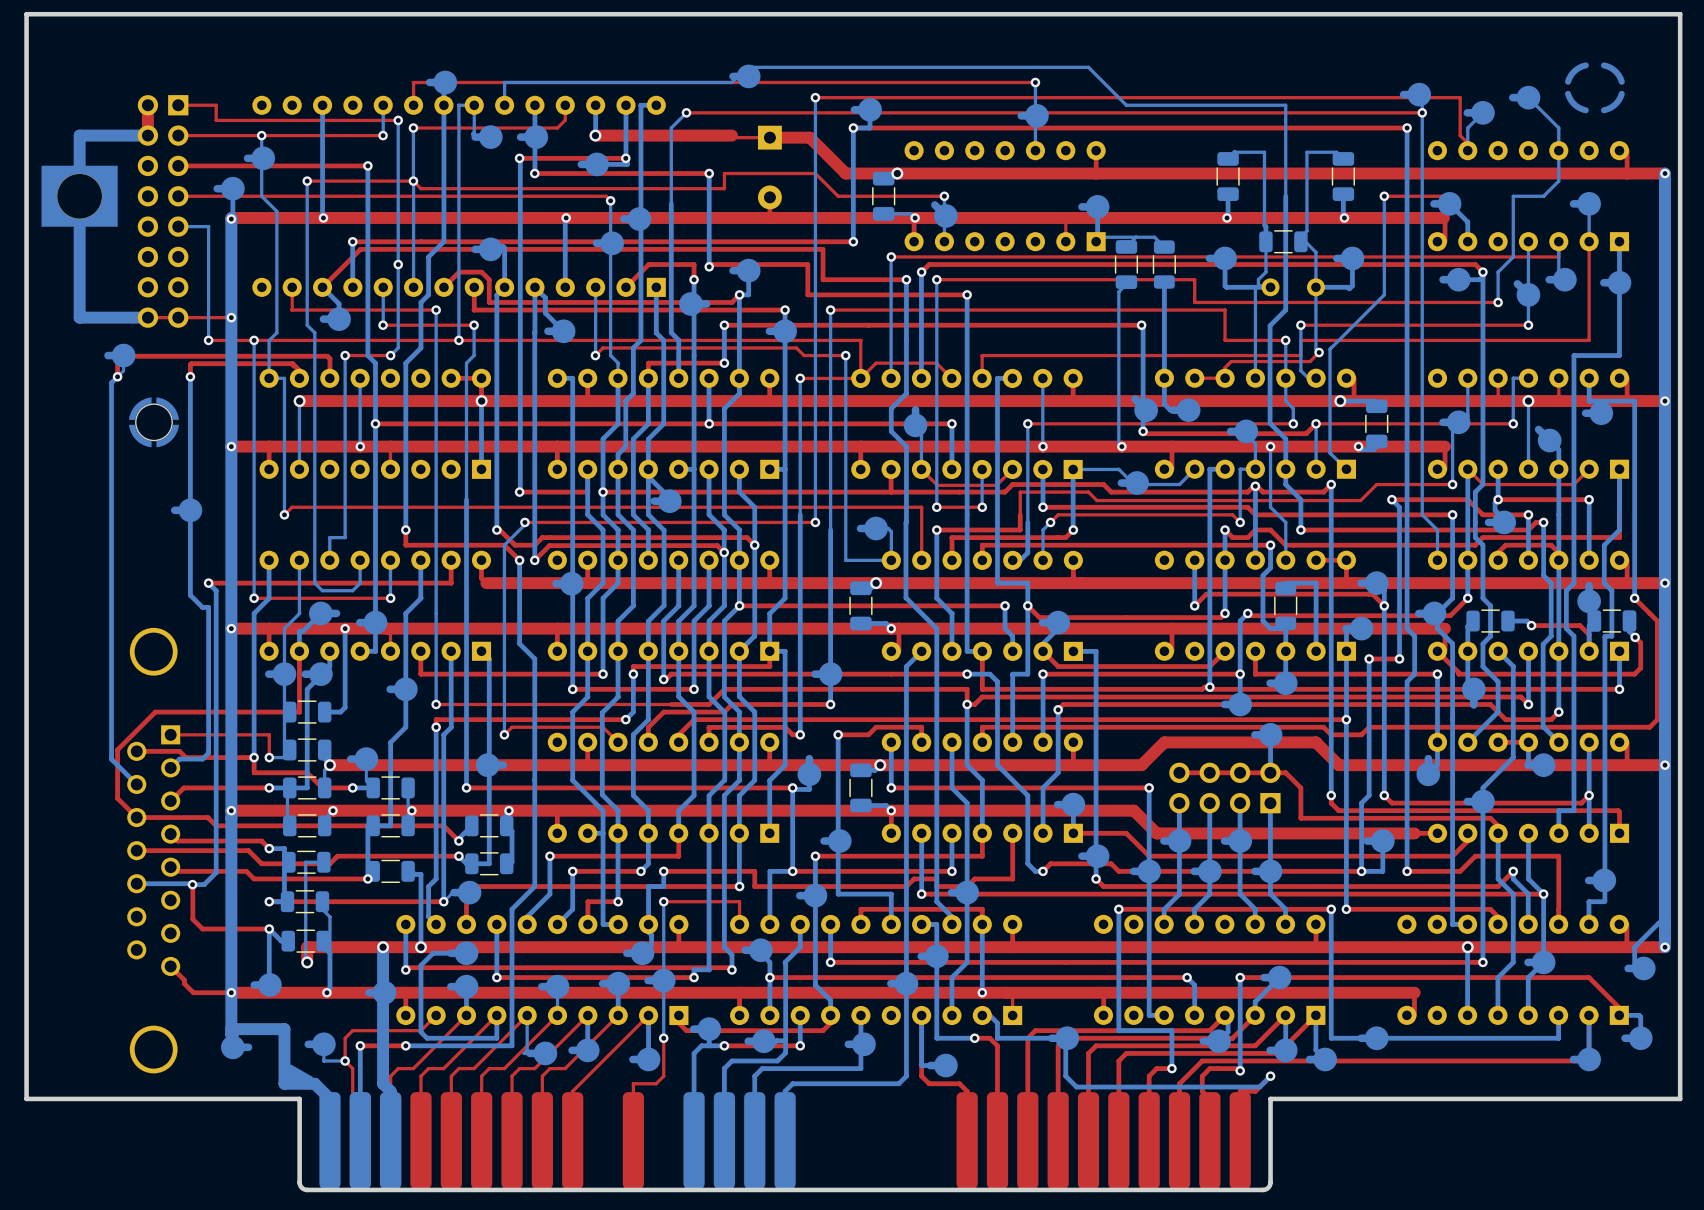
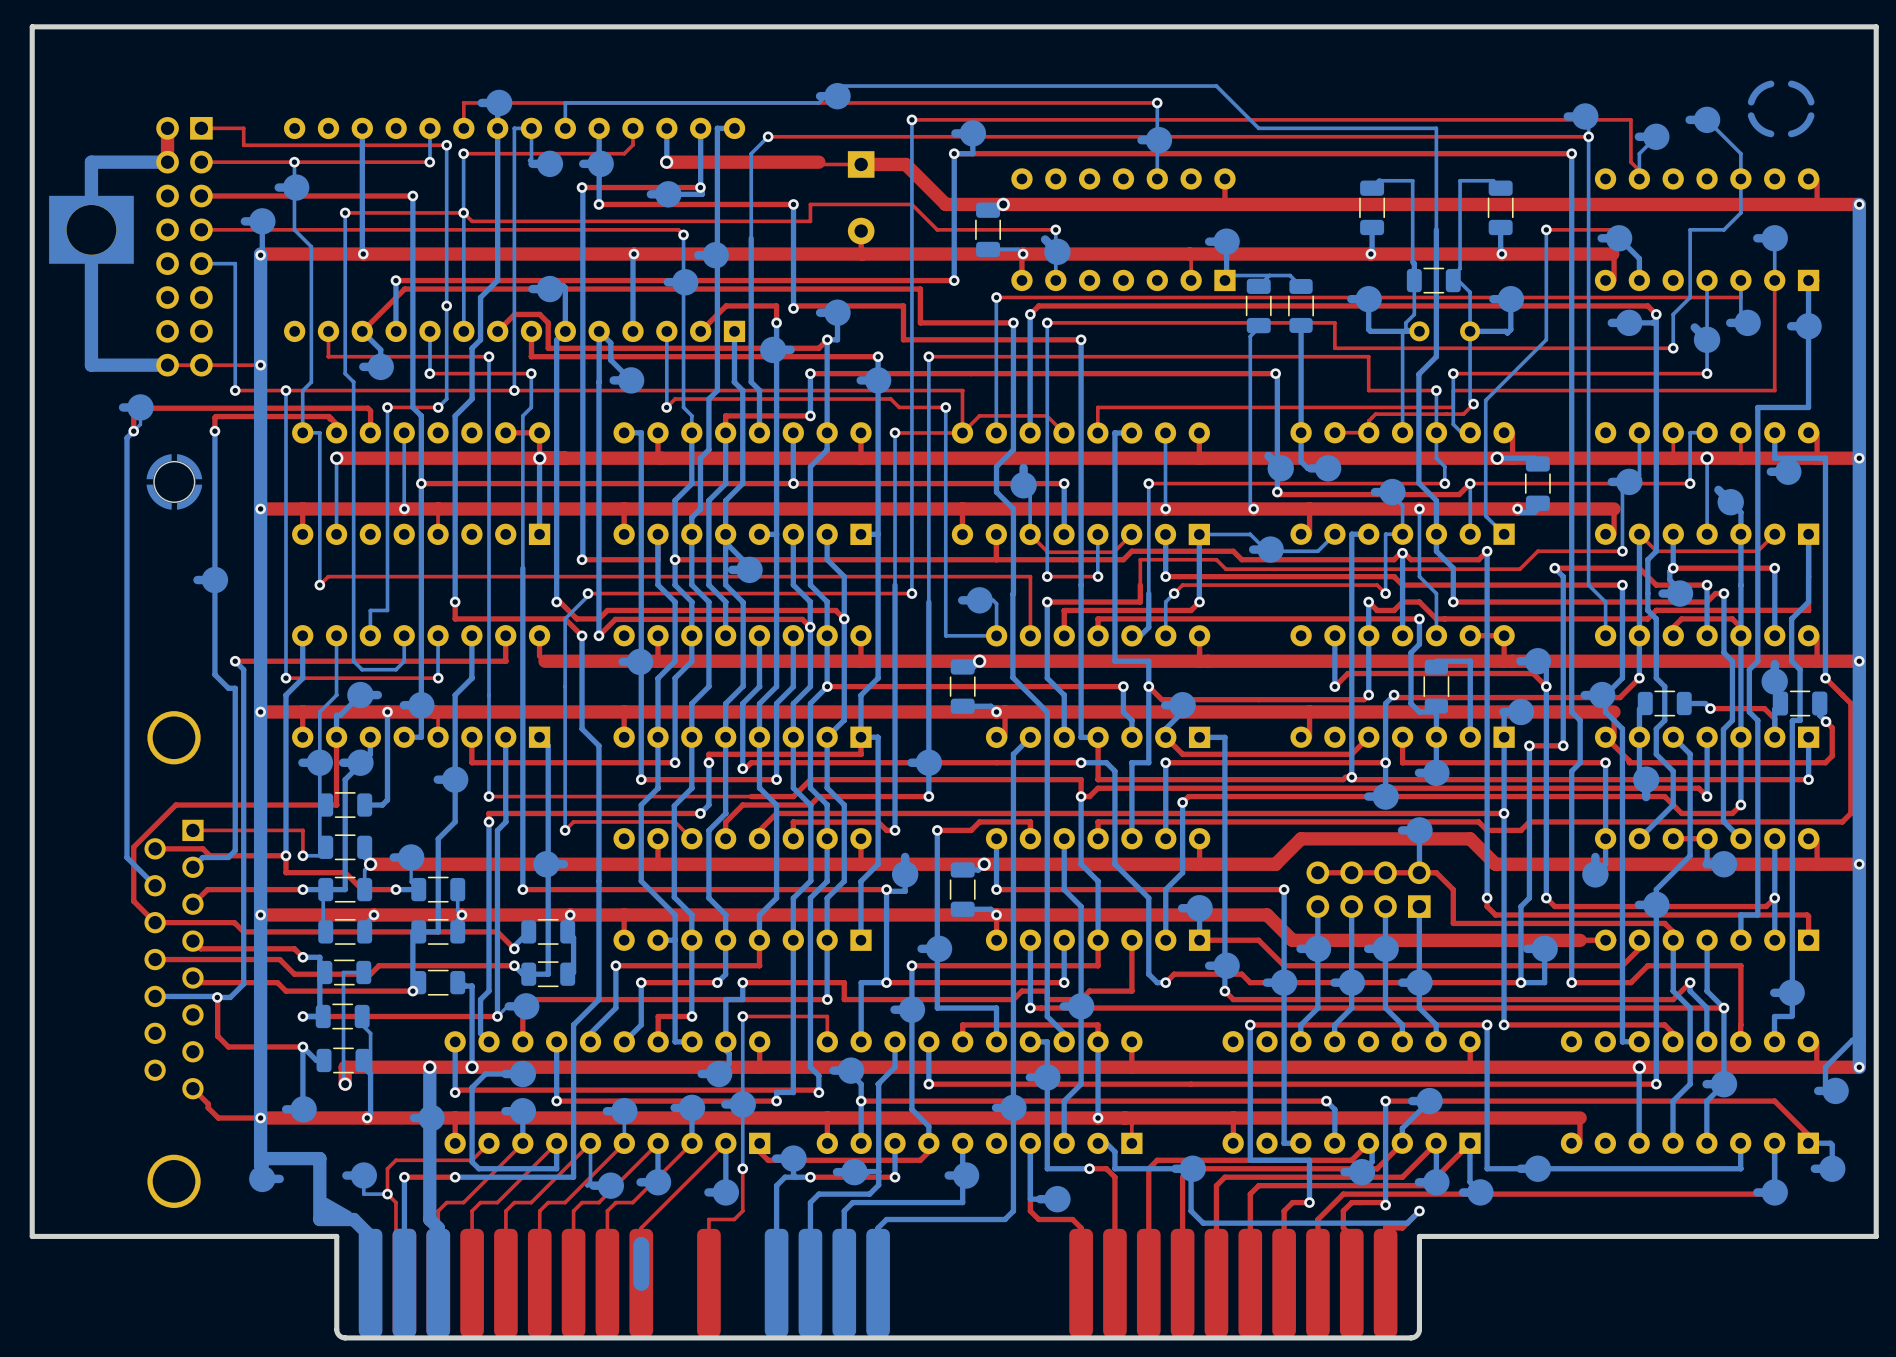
bottom track: none -> (641, 1244) (641, 1282)

